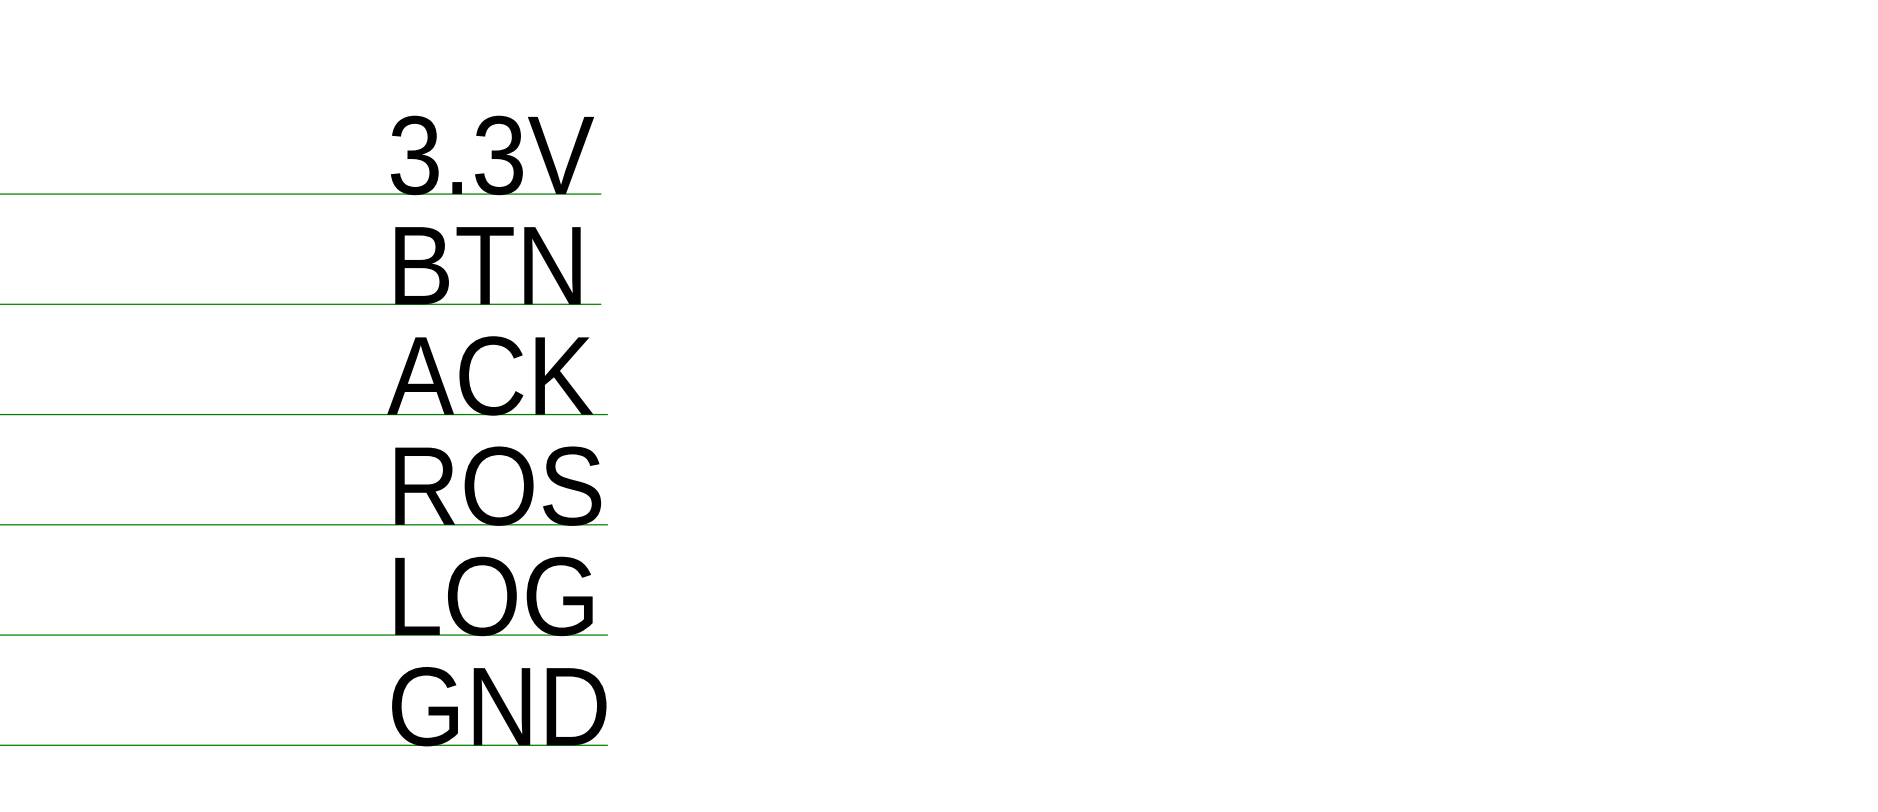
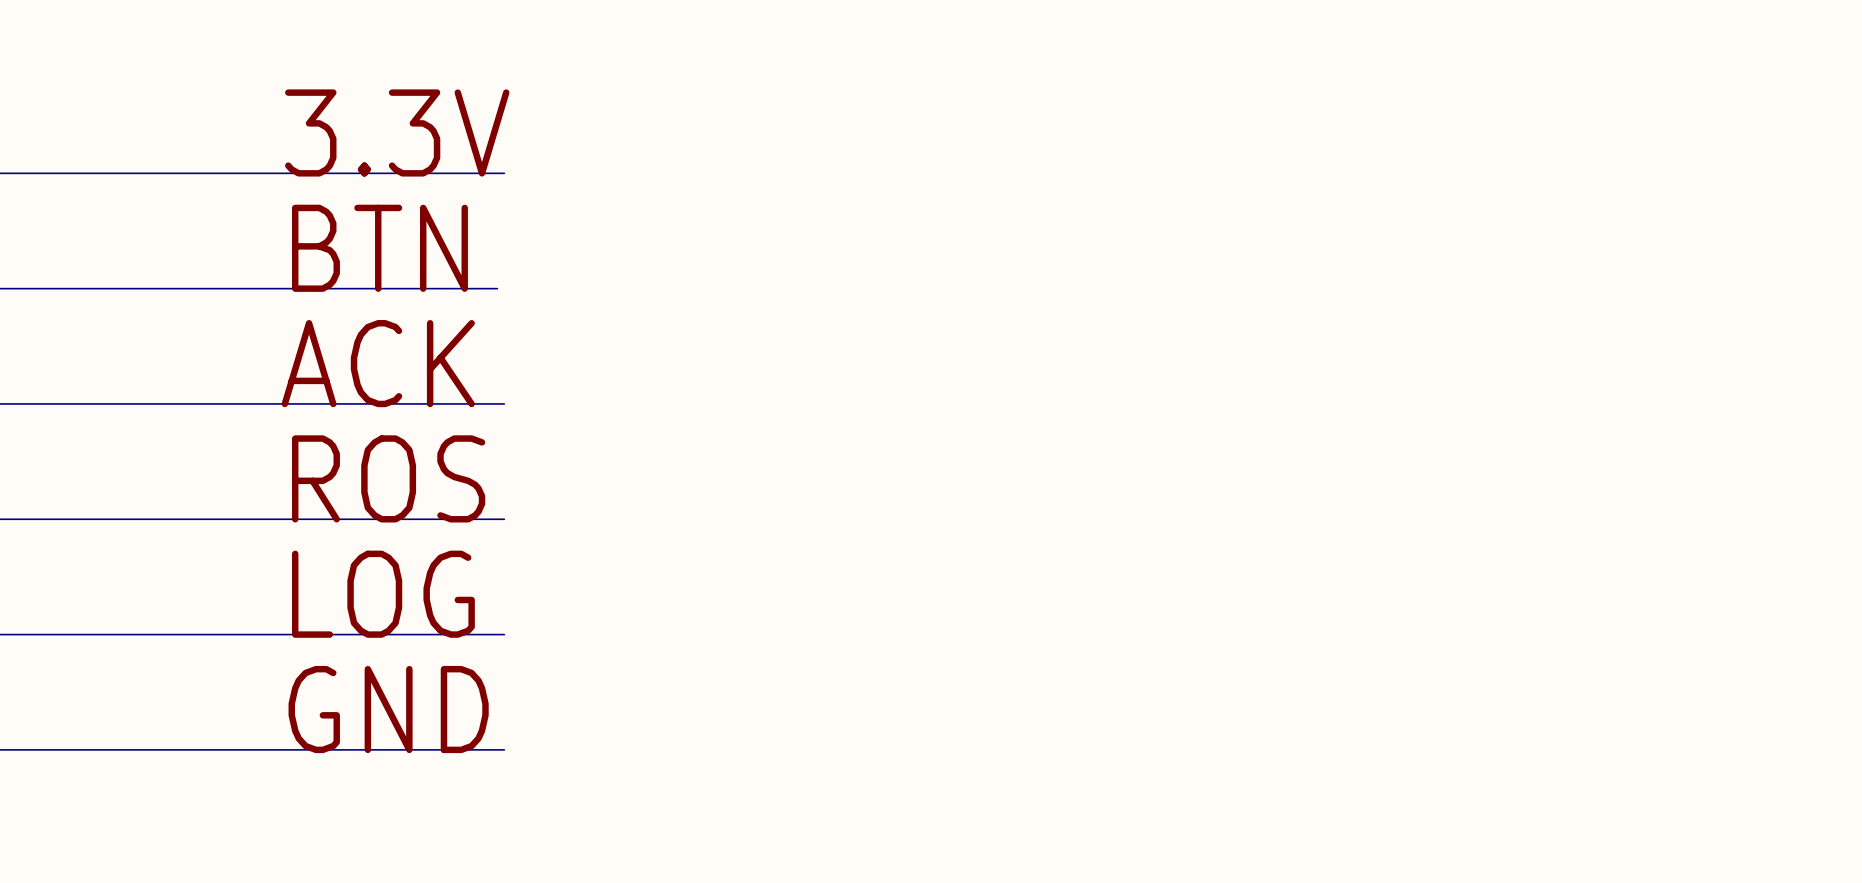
wire: none -> (497, 173) (504, 173)

